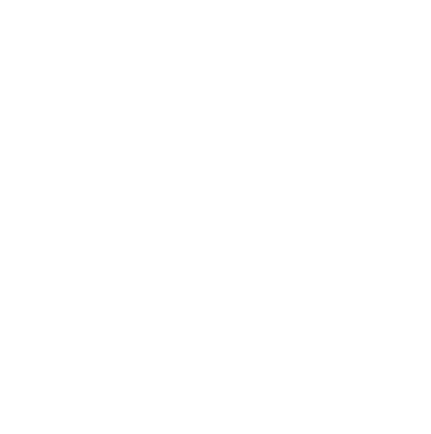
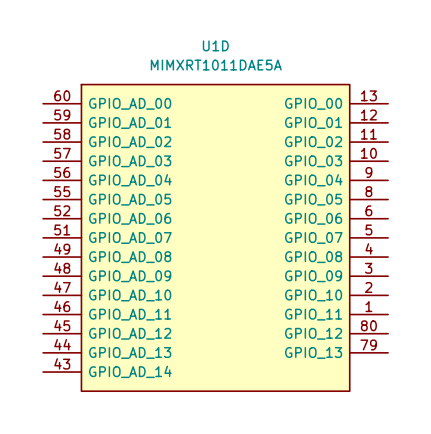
U1D: none -> MIMXRT1011DAE5A (215, 237)

